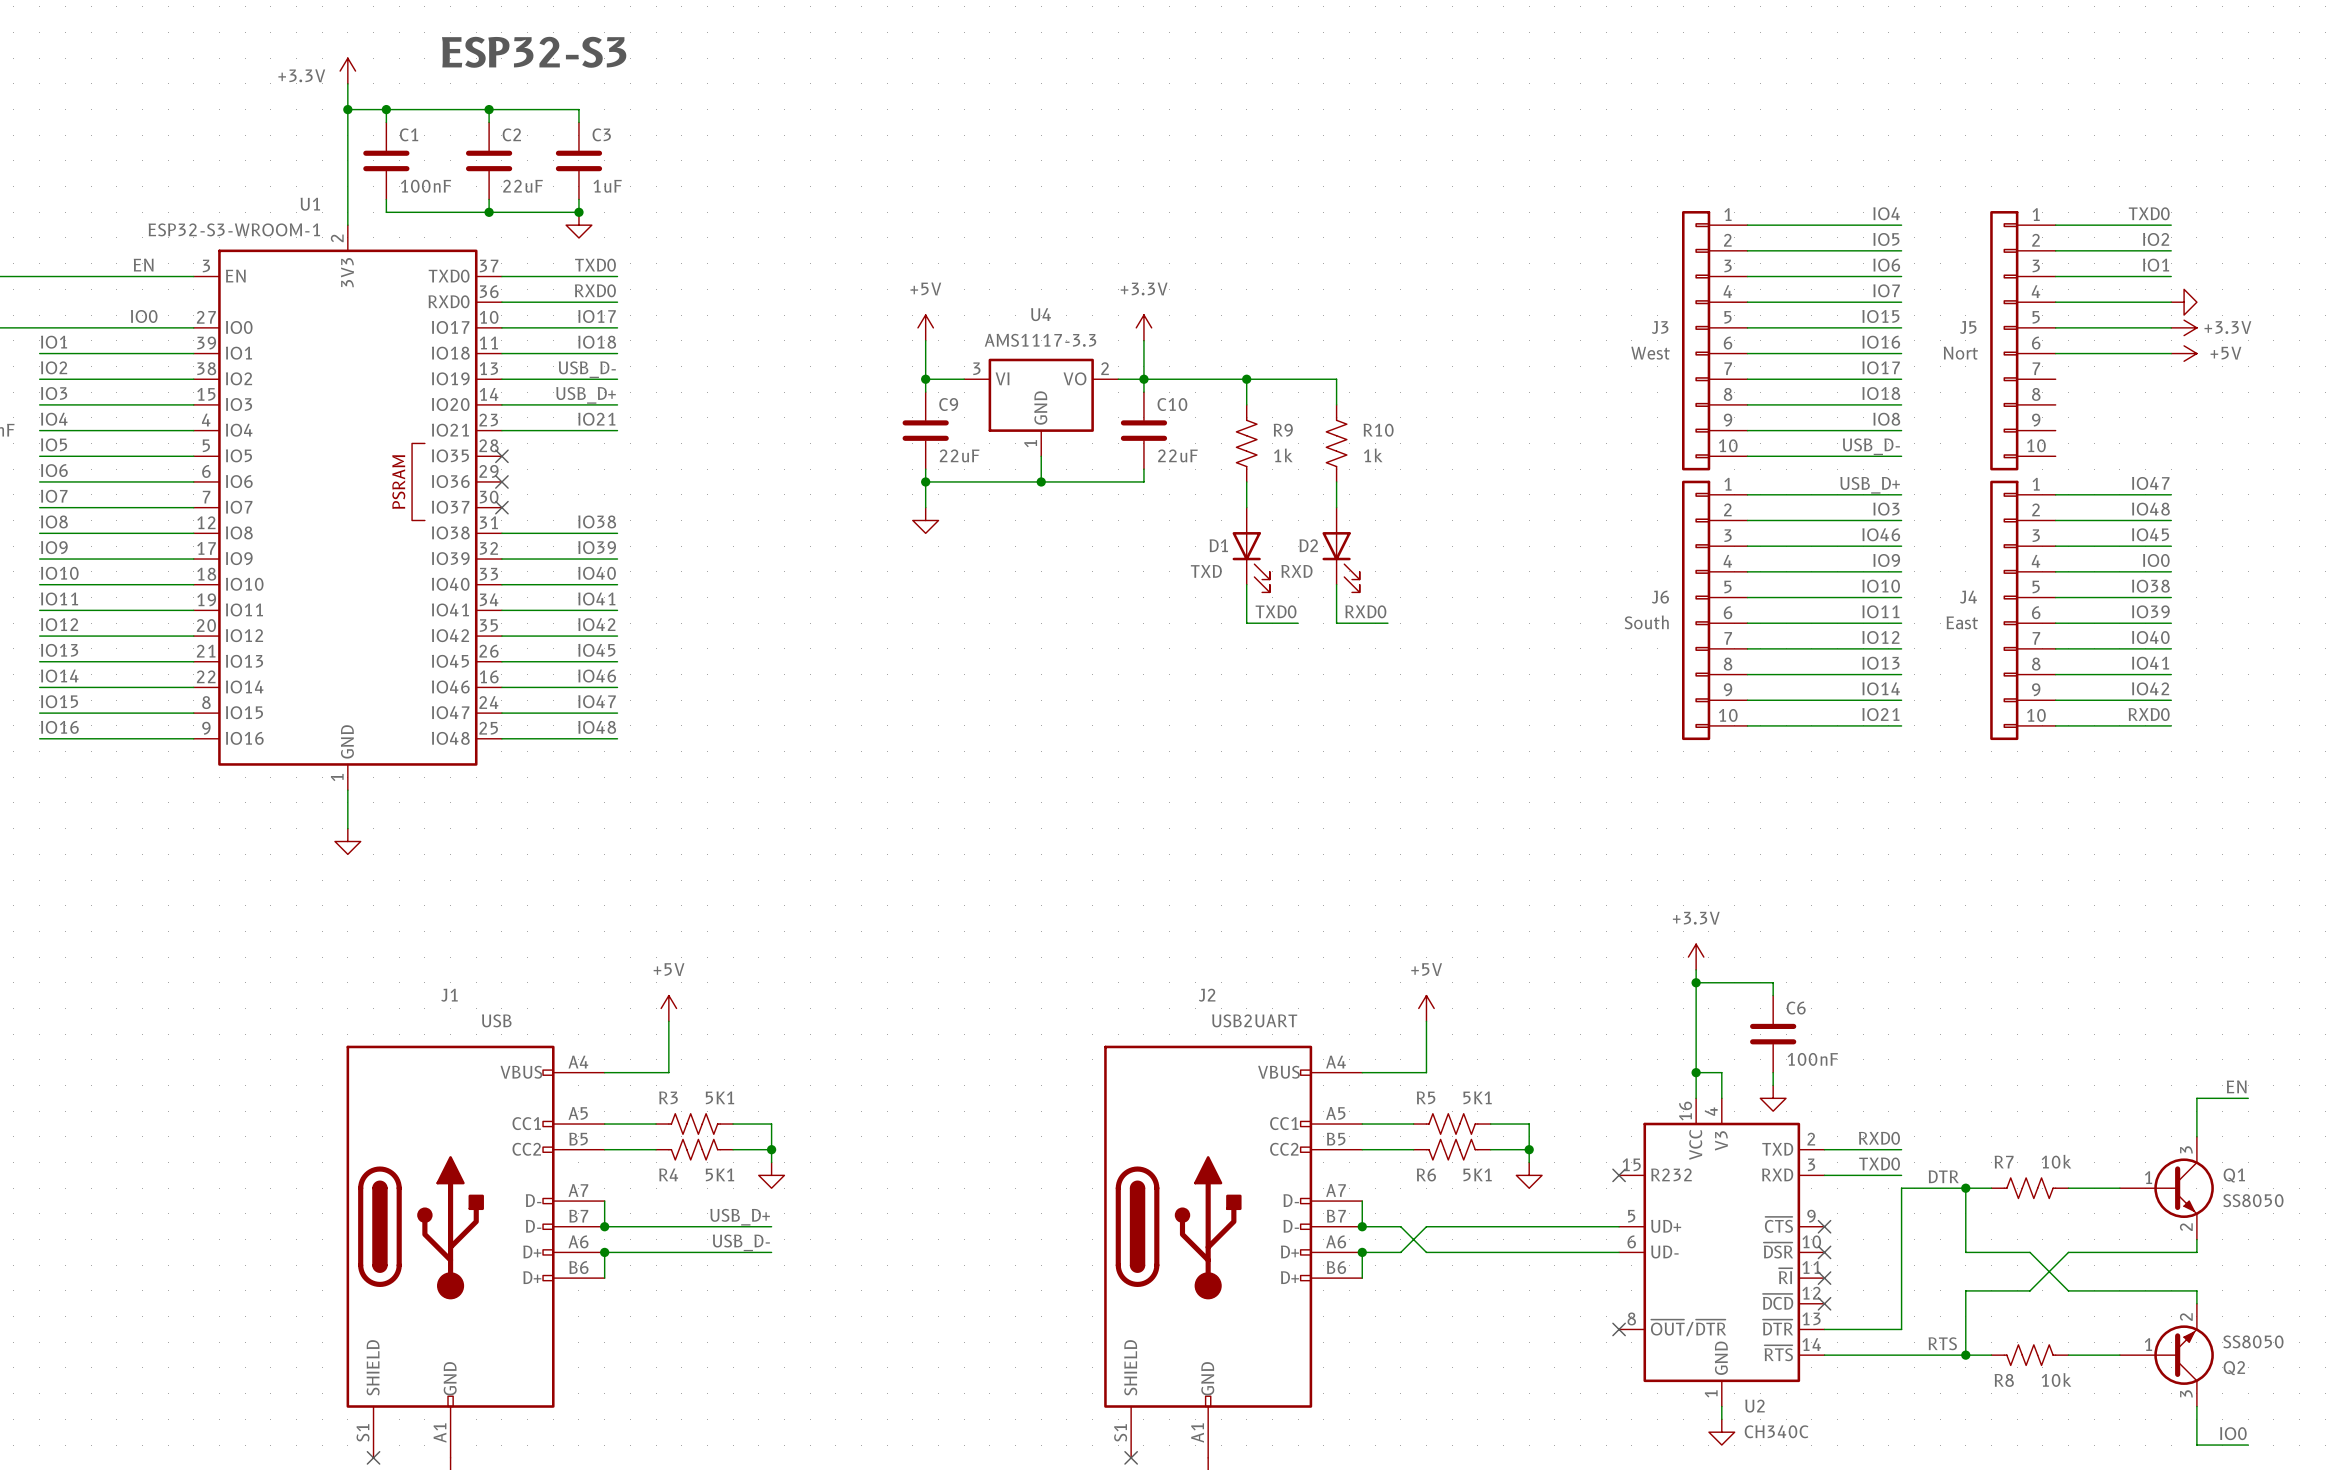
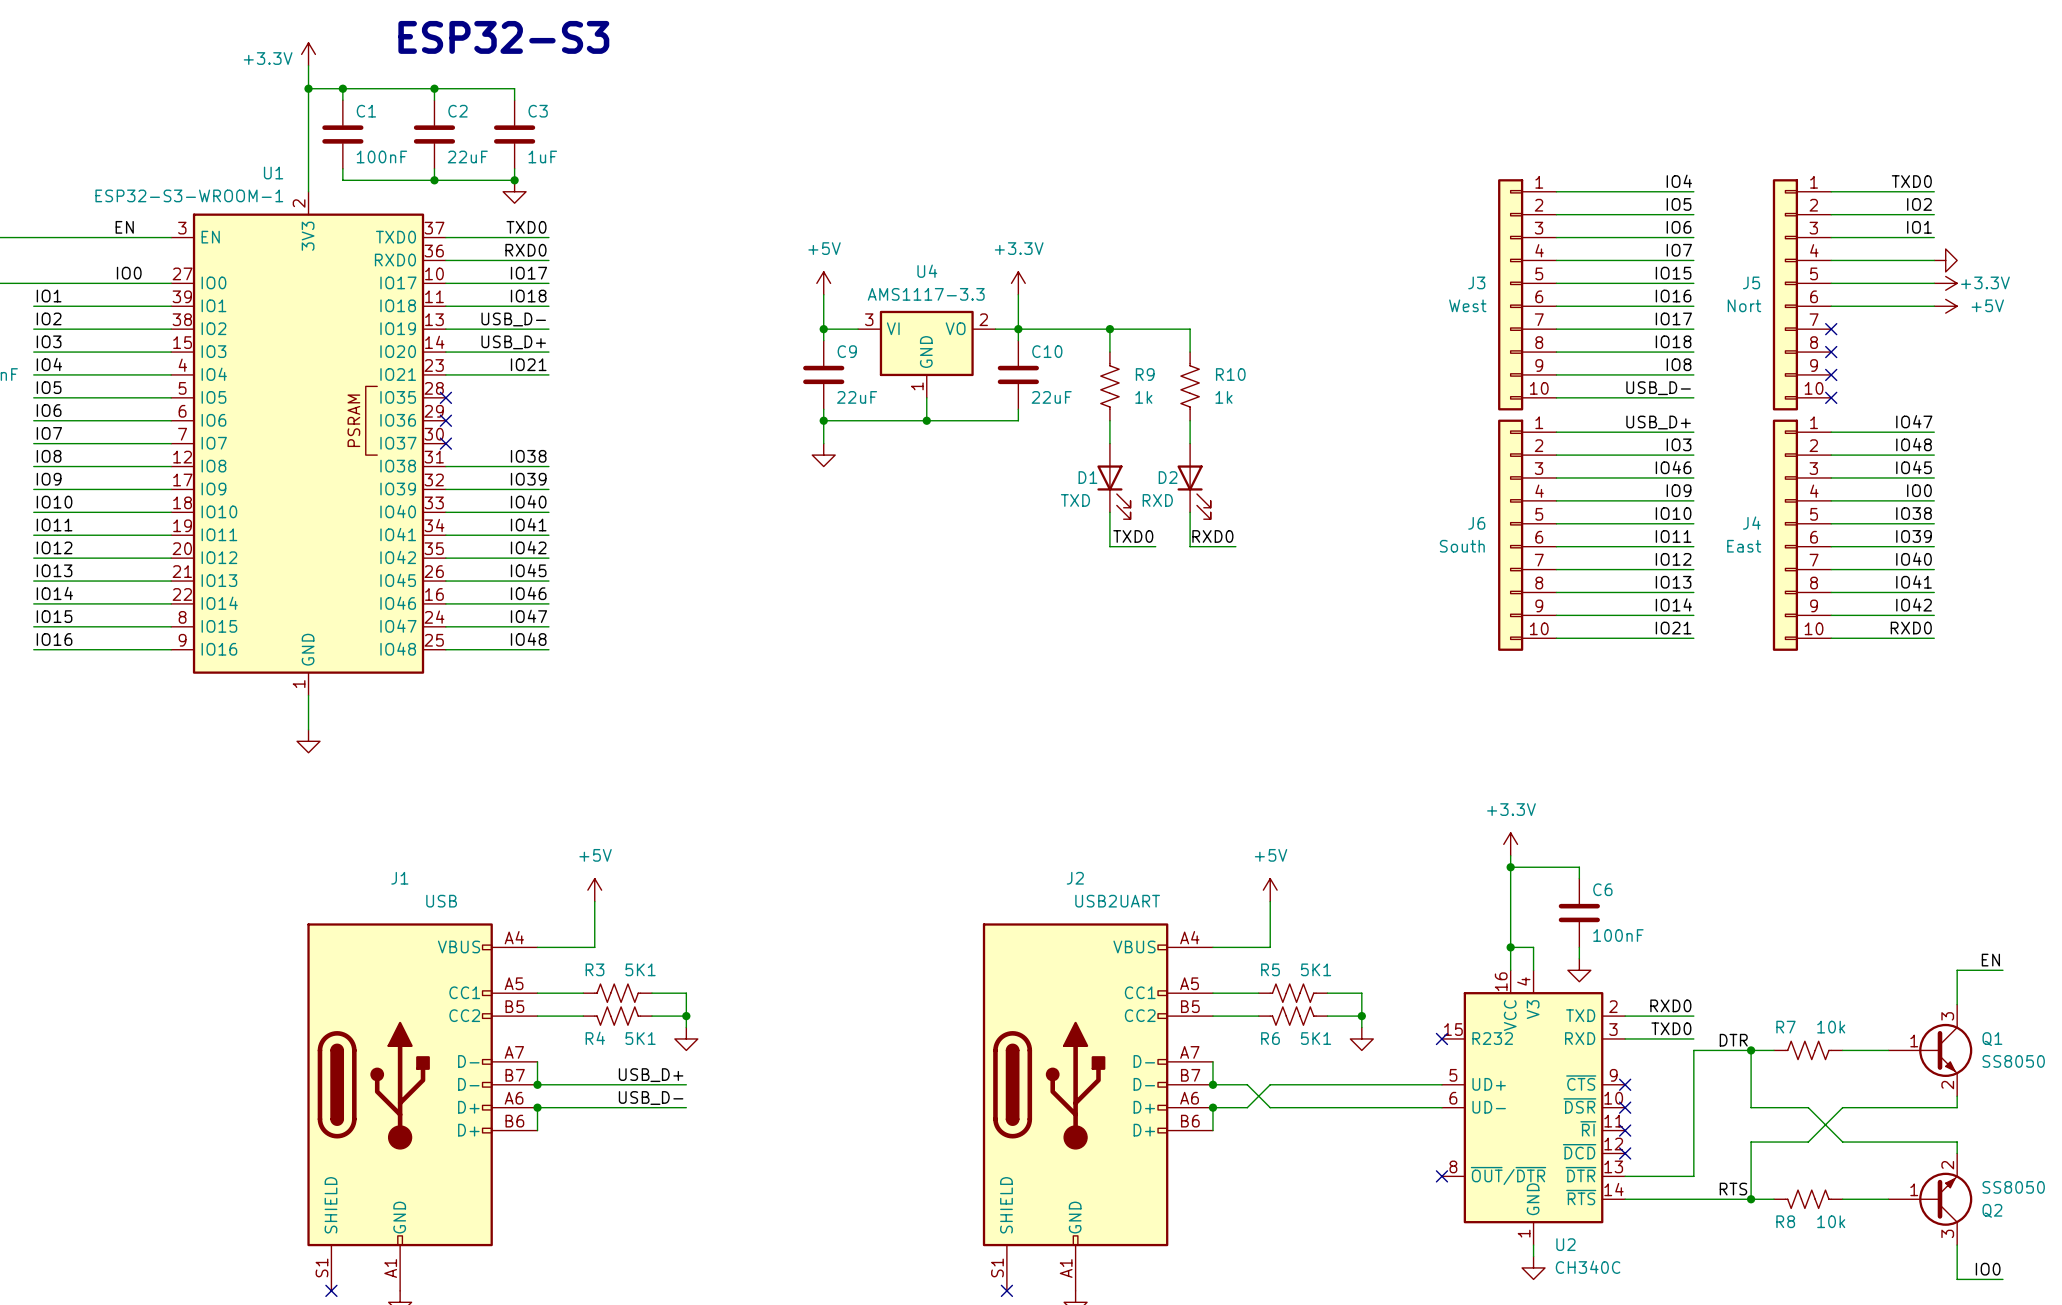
no-connect mark: none -> (1831, 329)
no-connect mark: none -> (1831, 352)
no-connect mark: none -> (1831, 374)
no-connect mark: none -> (1831, 397)

